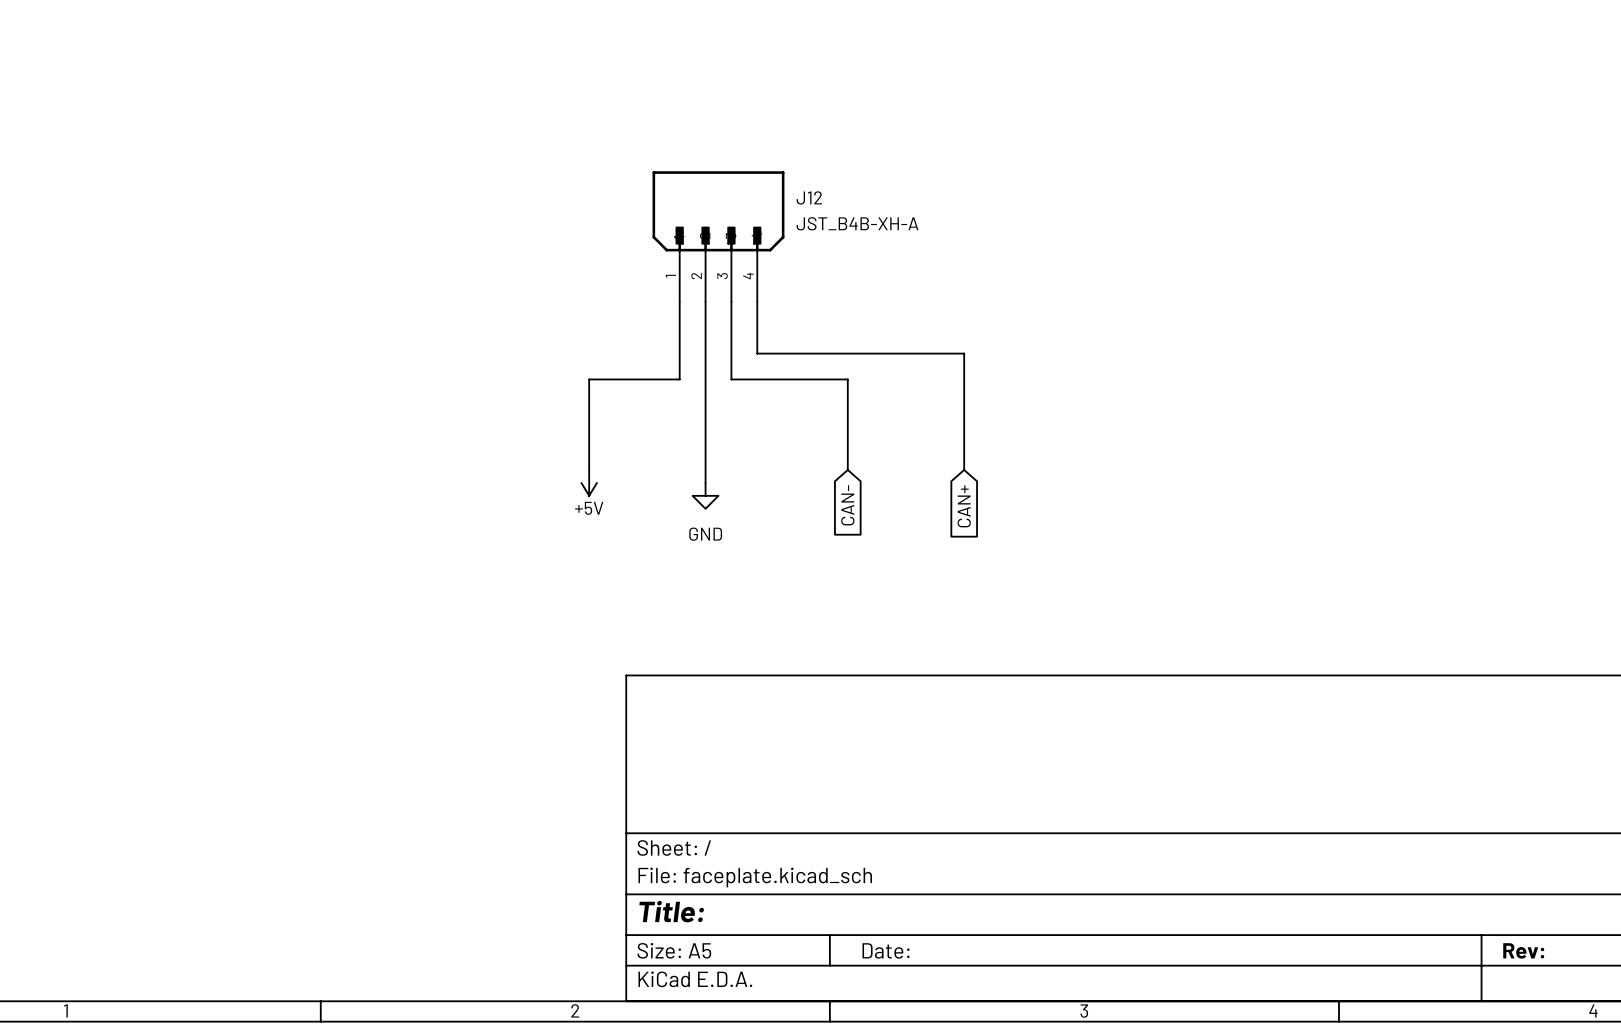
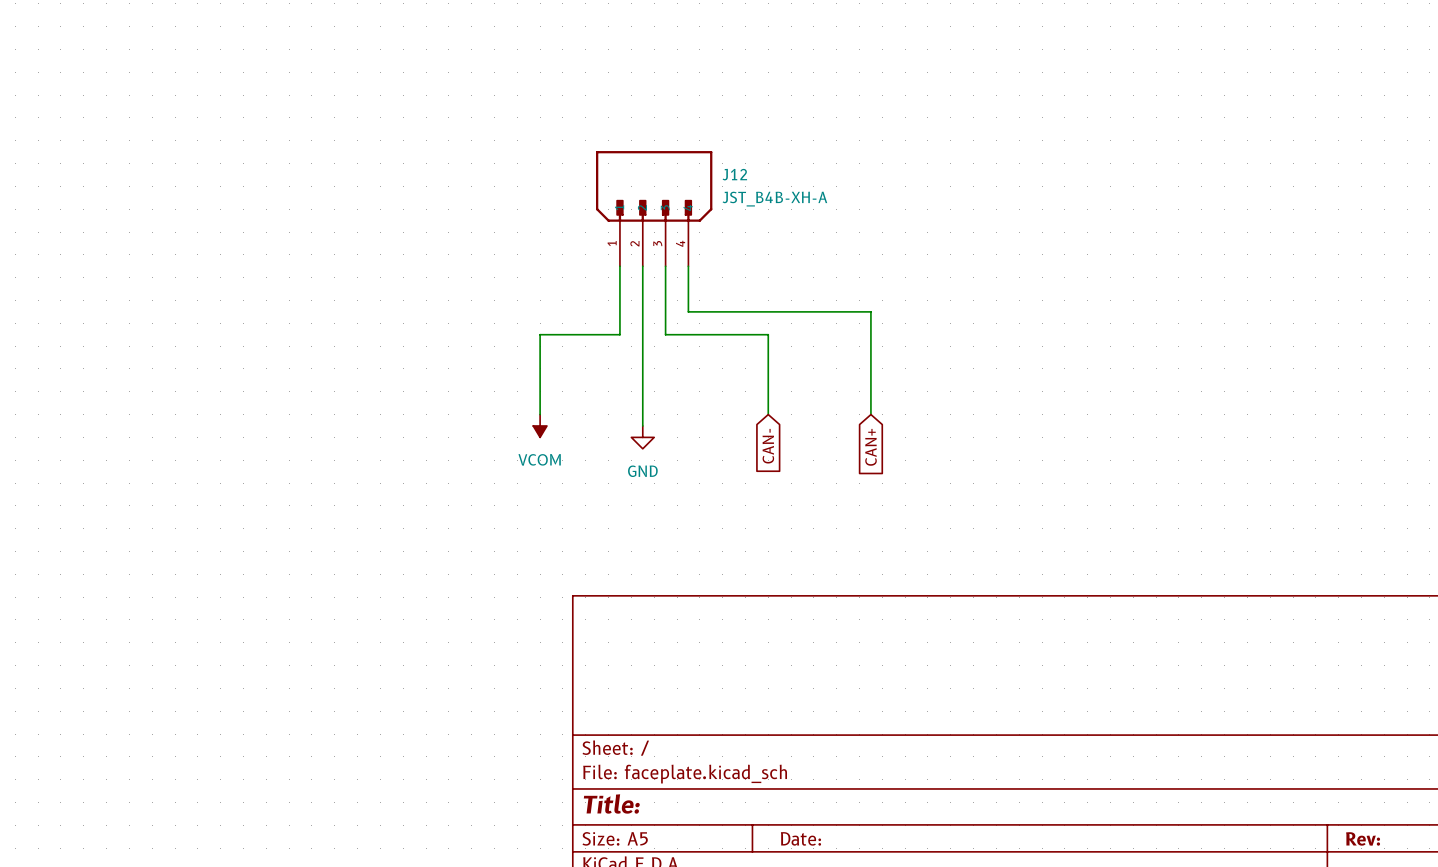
power symbol: +5V (589, 482) -> VCOM (540, 425)

